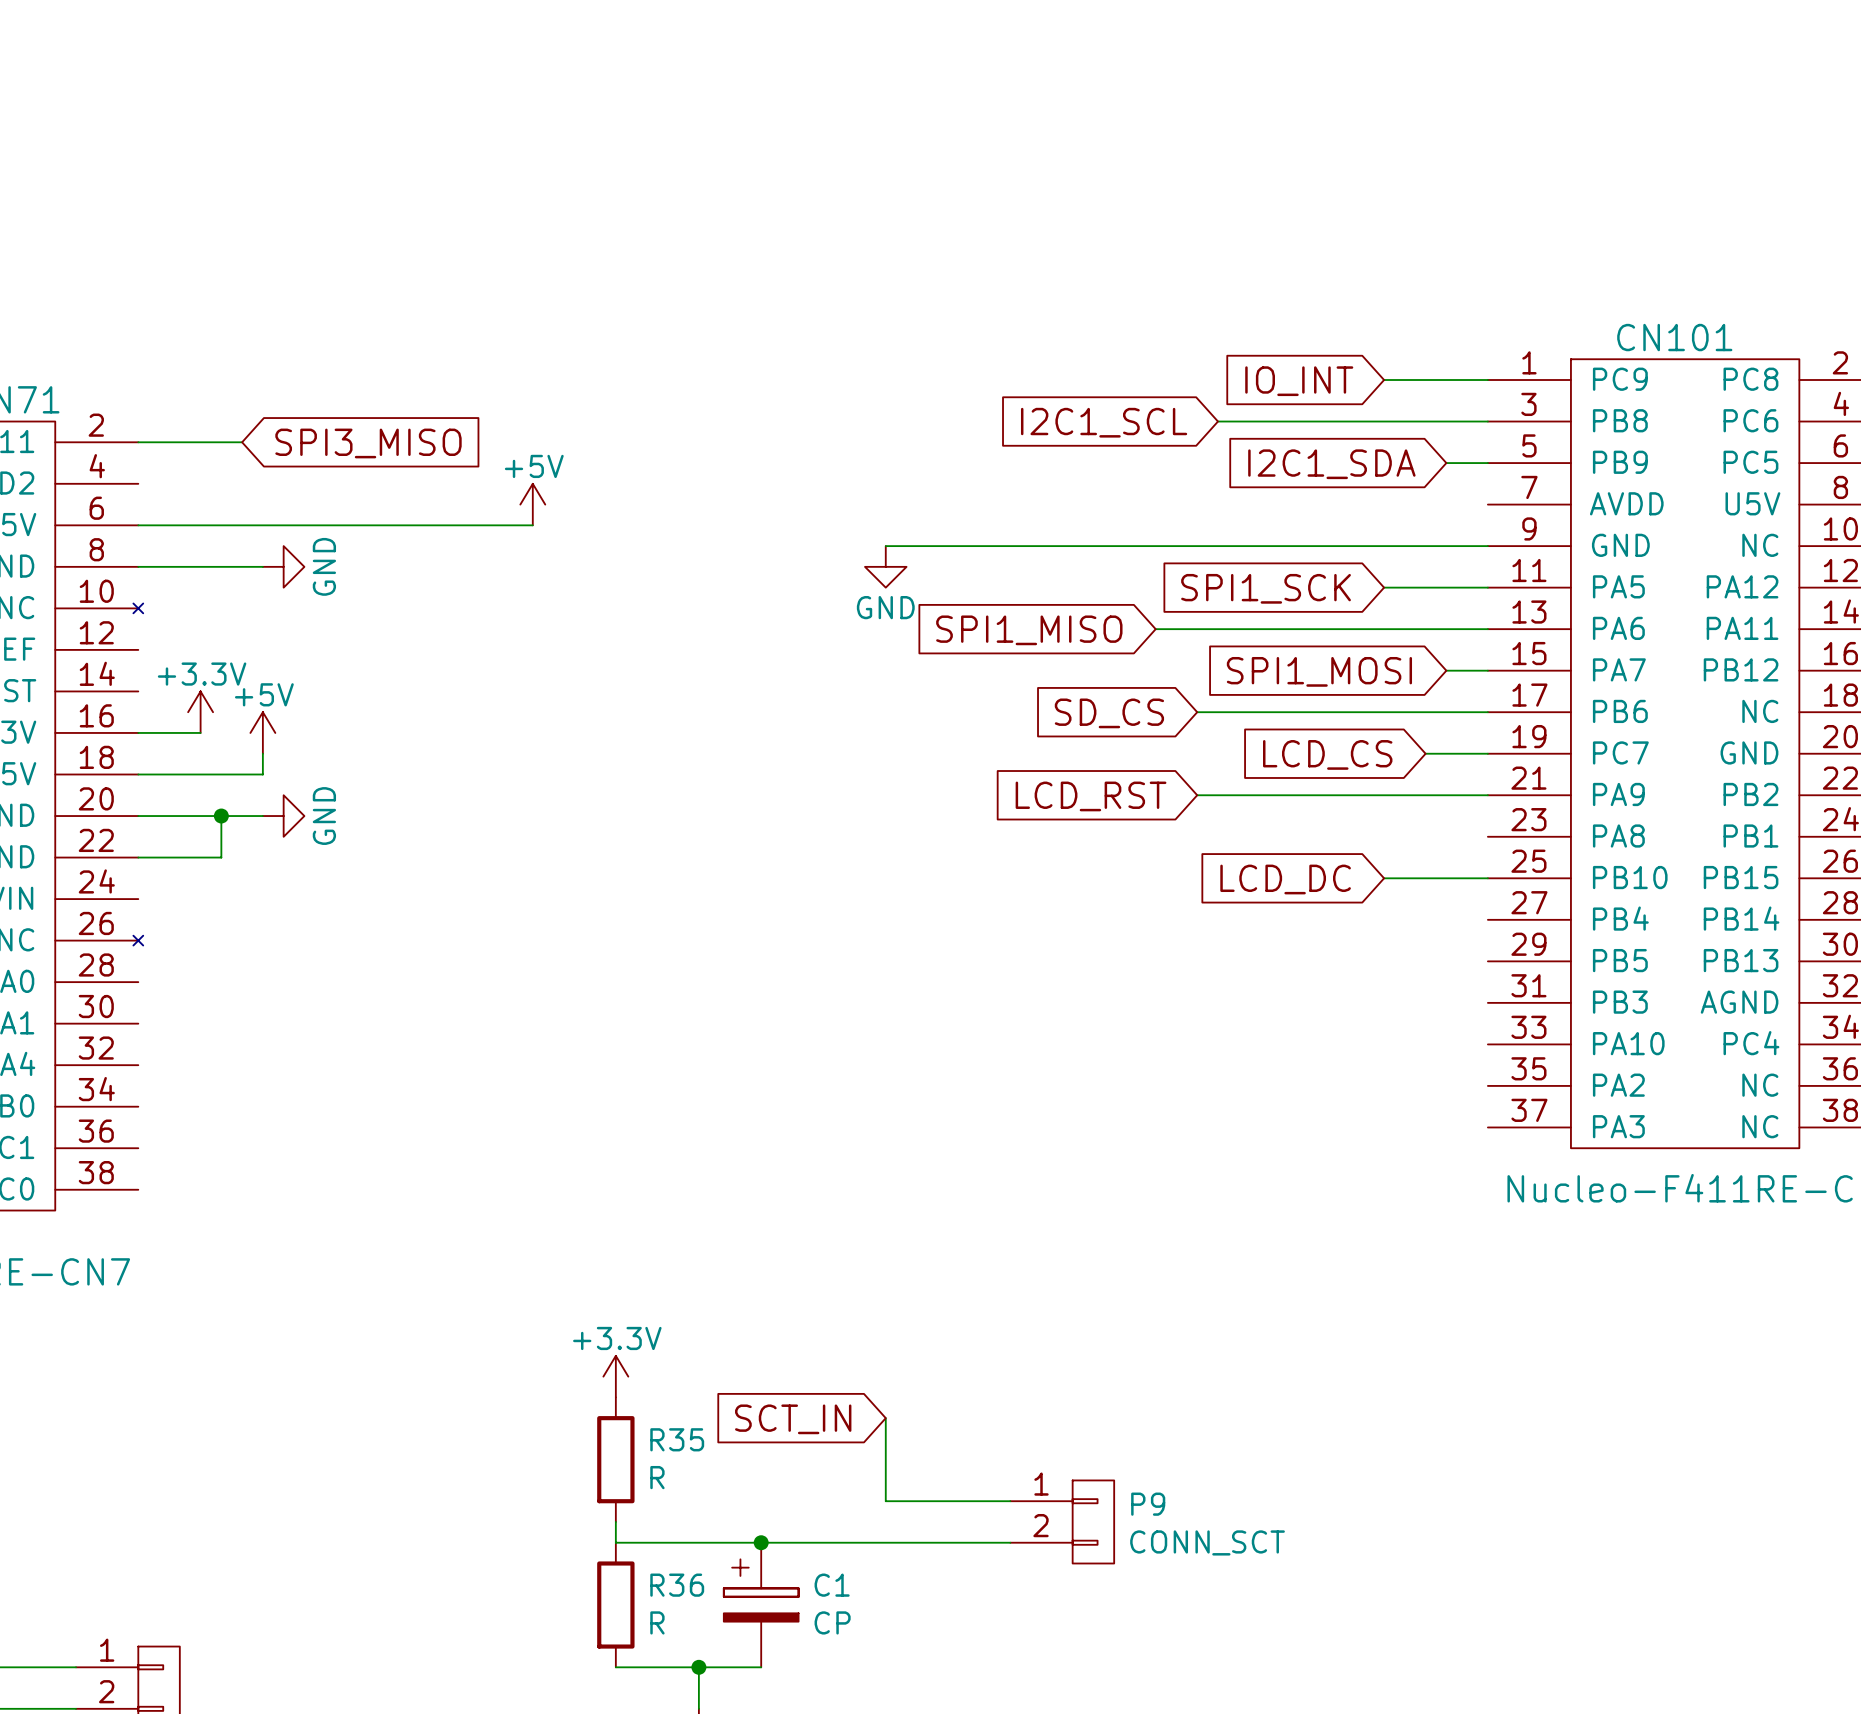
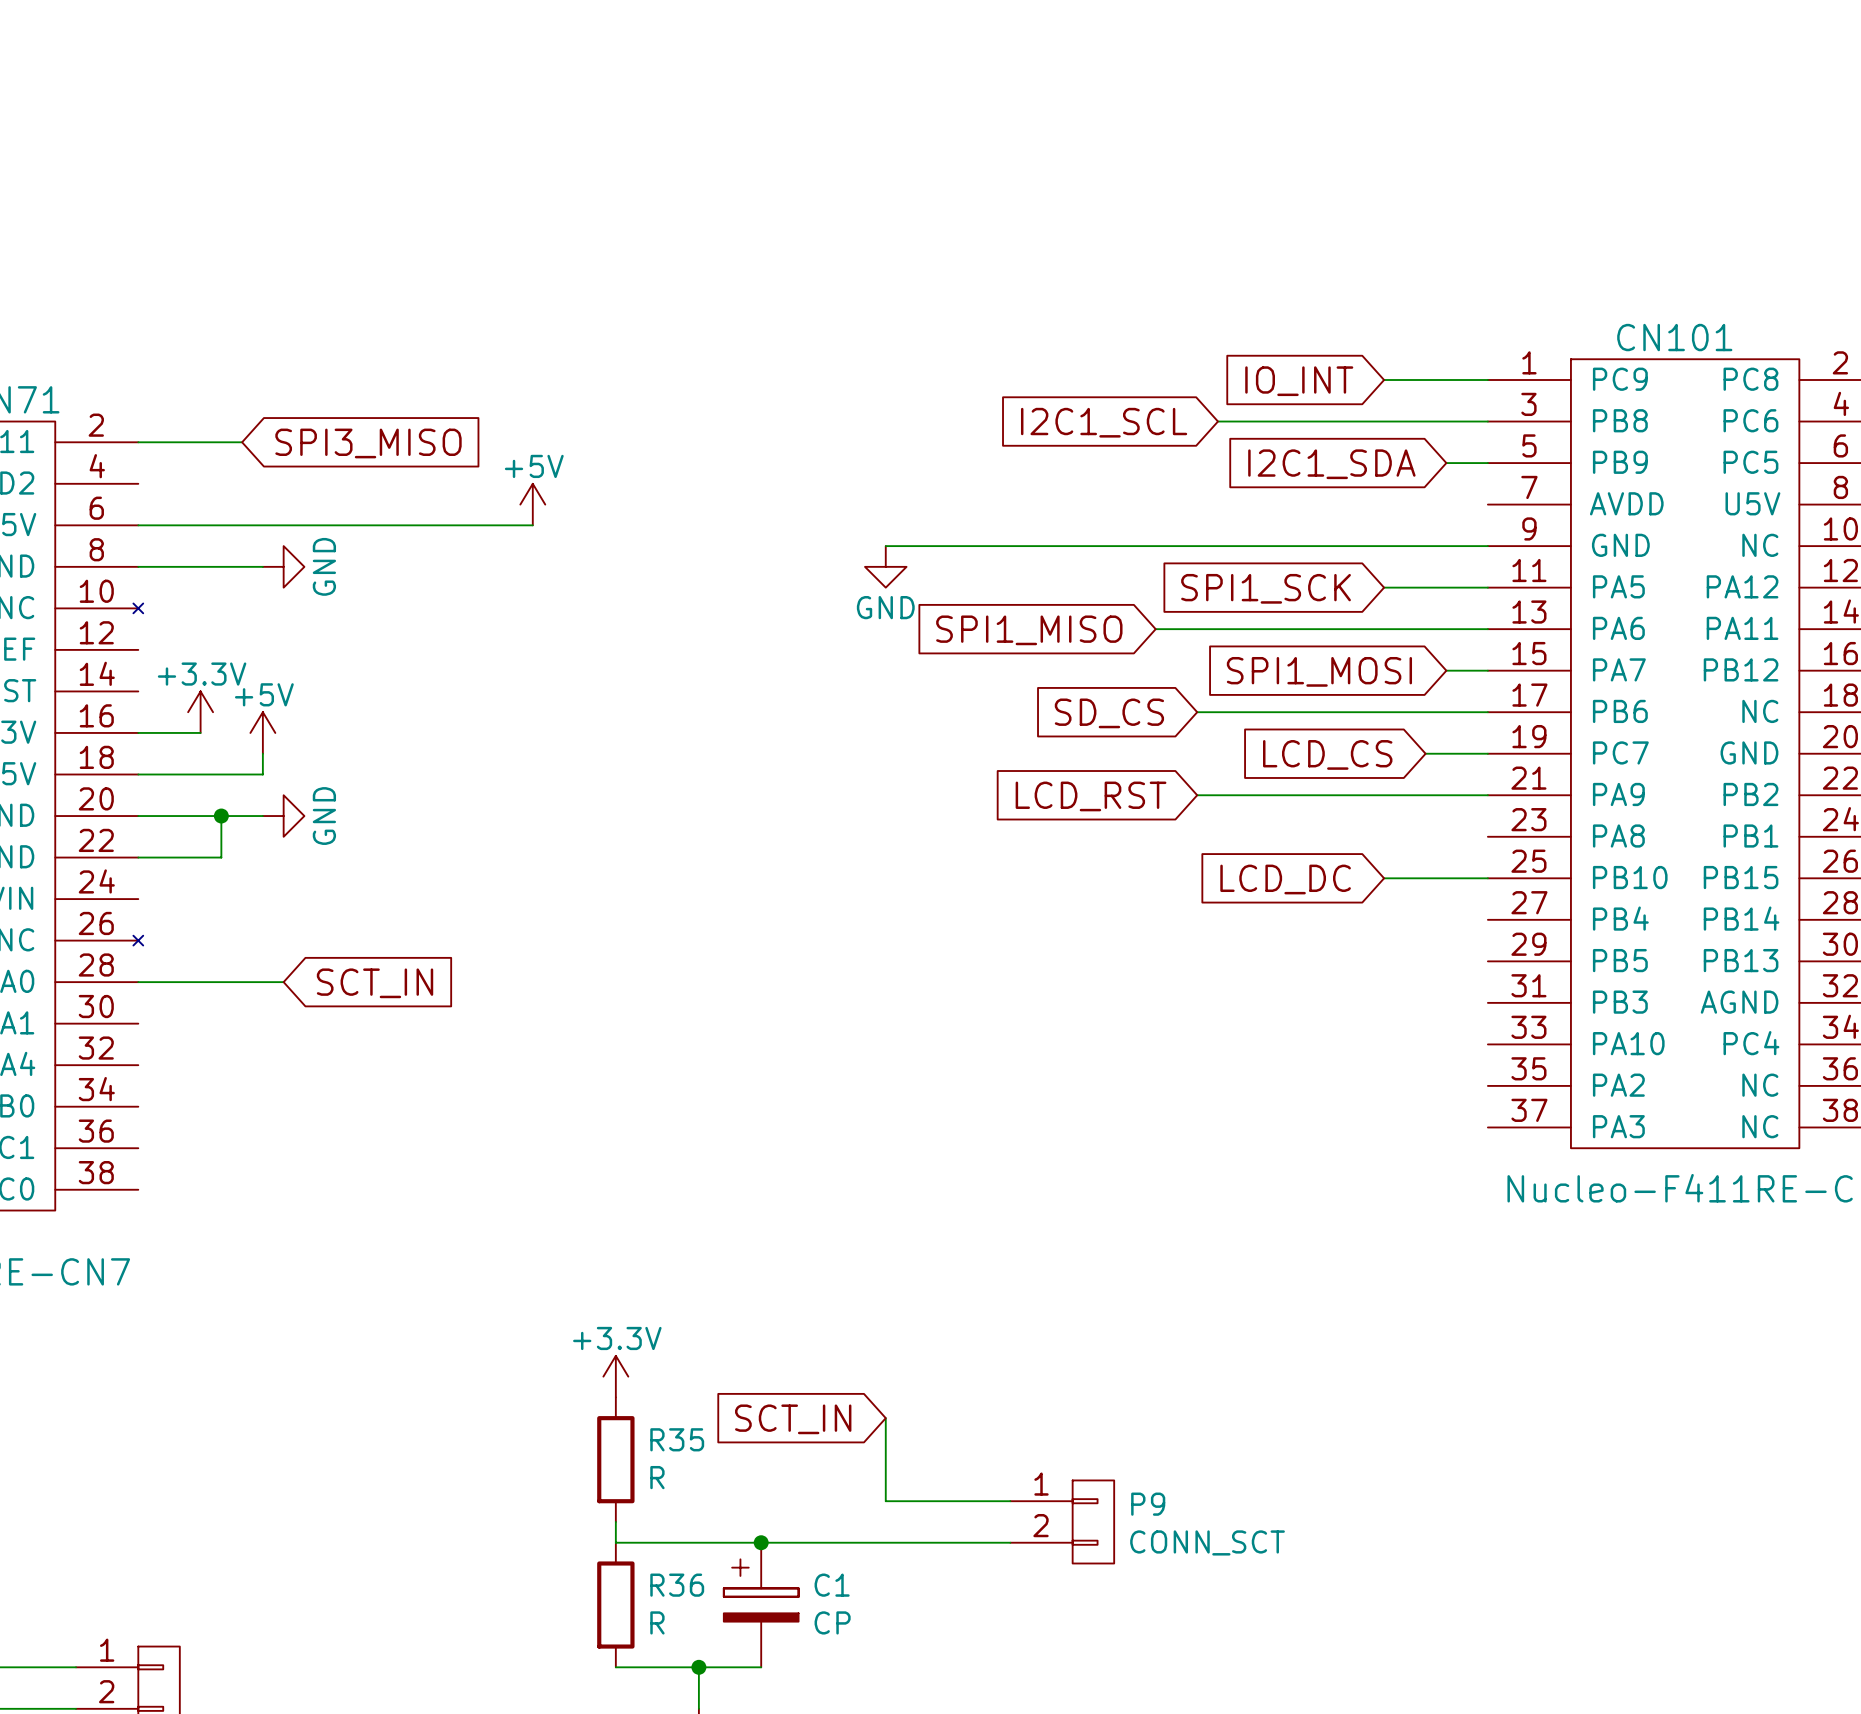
wire: none -> (138, 982) (283, 982)
global label: none -> SCT_IN (375, 983)

